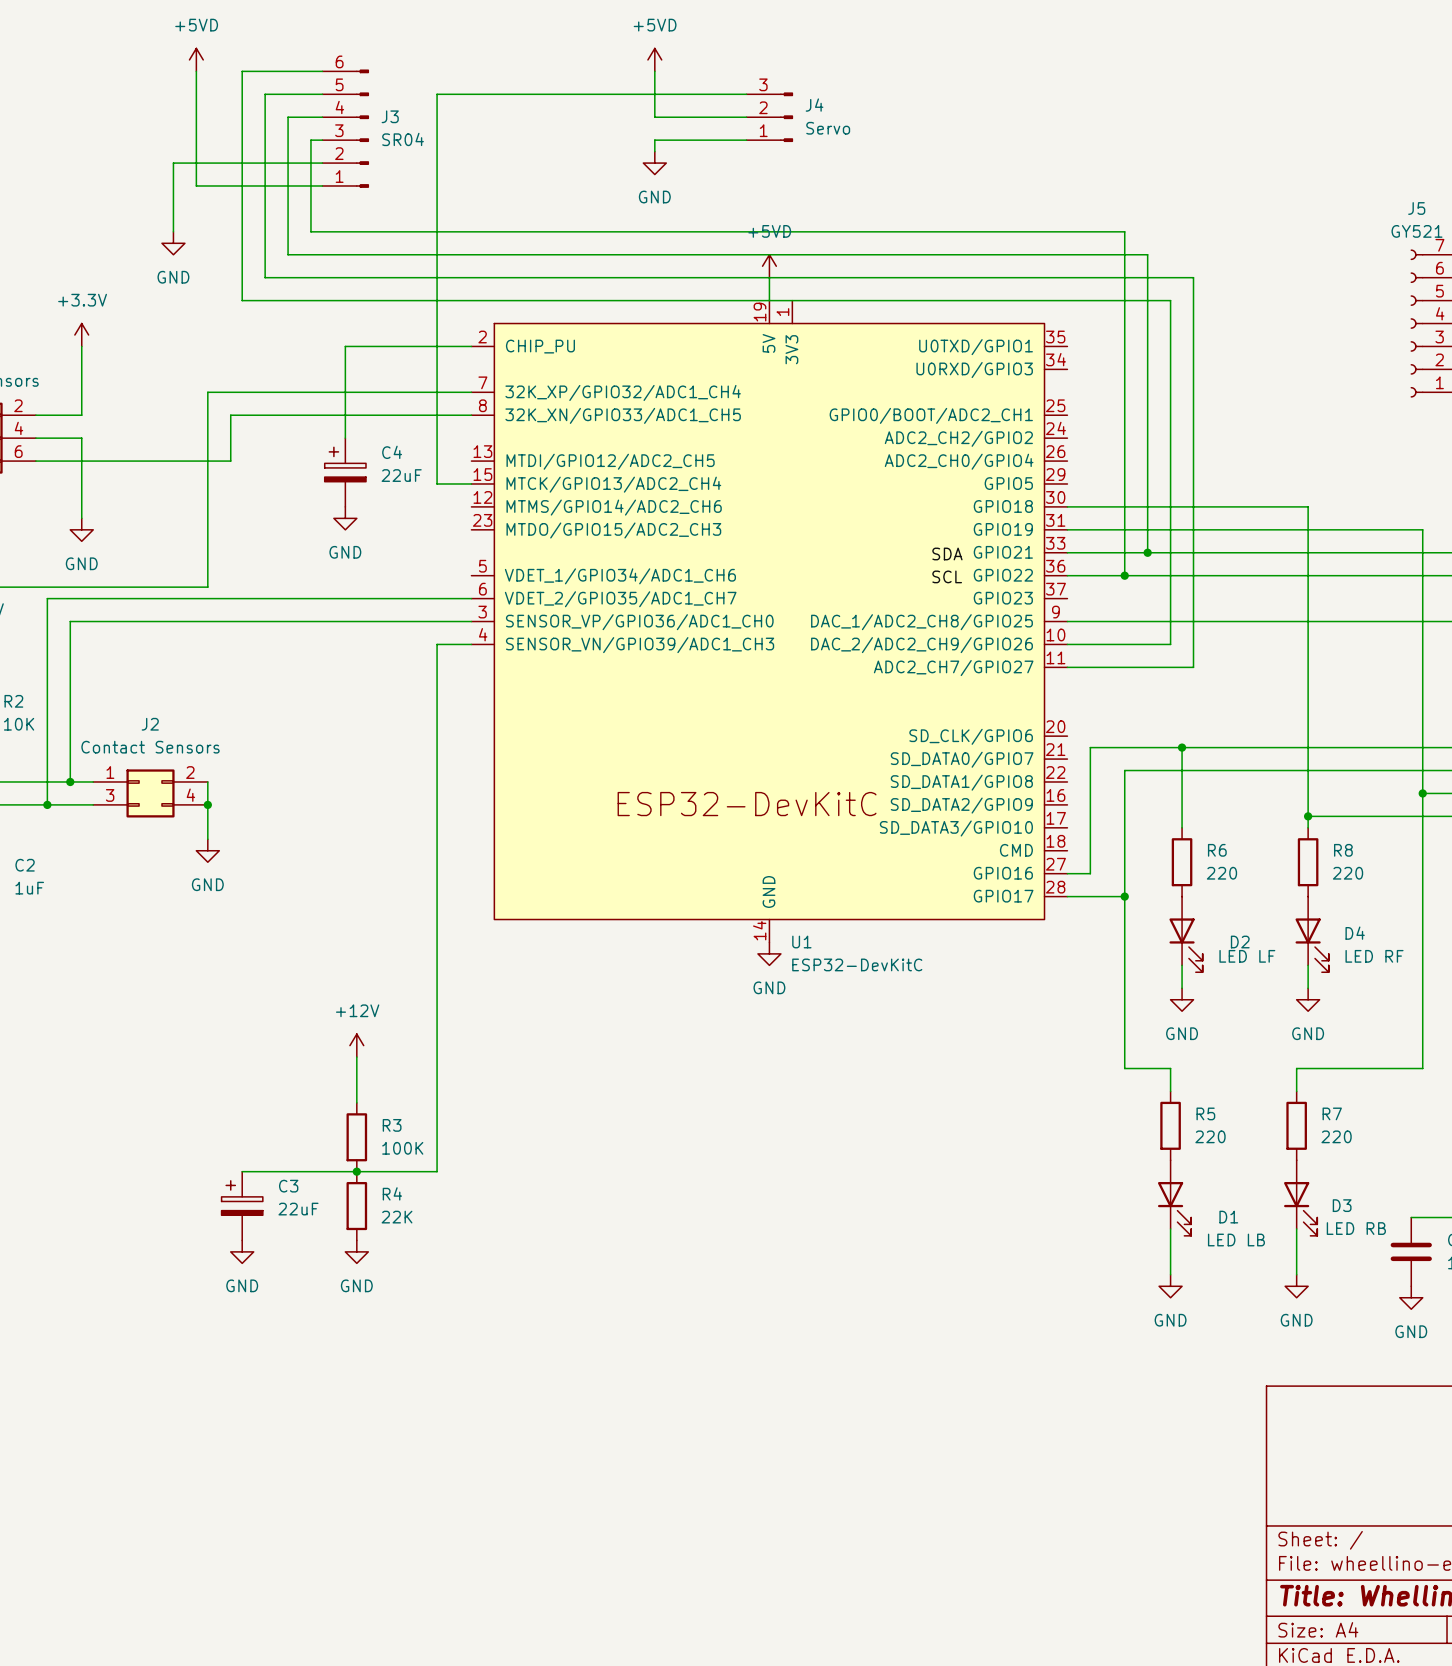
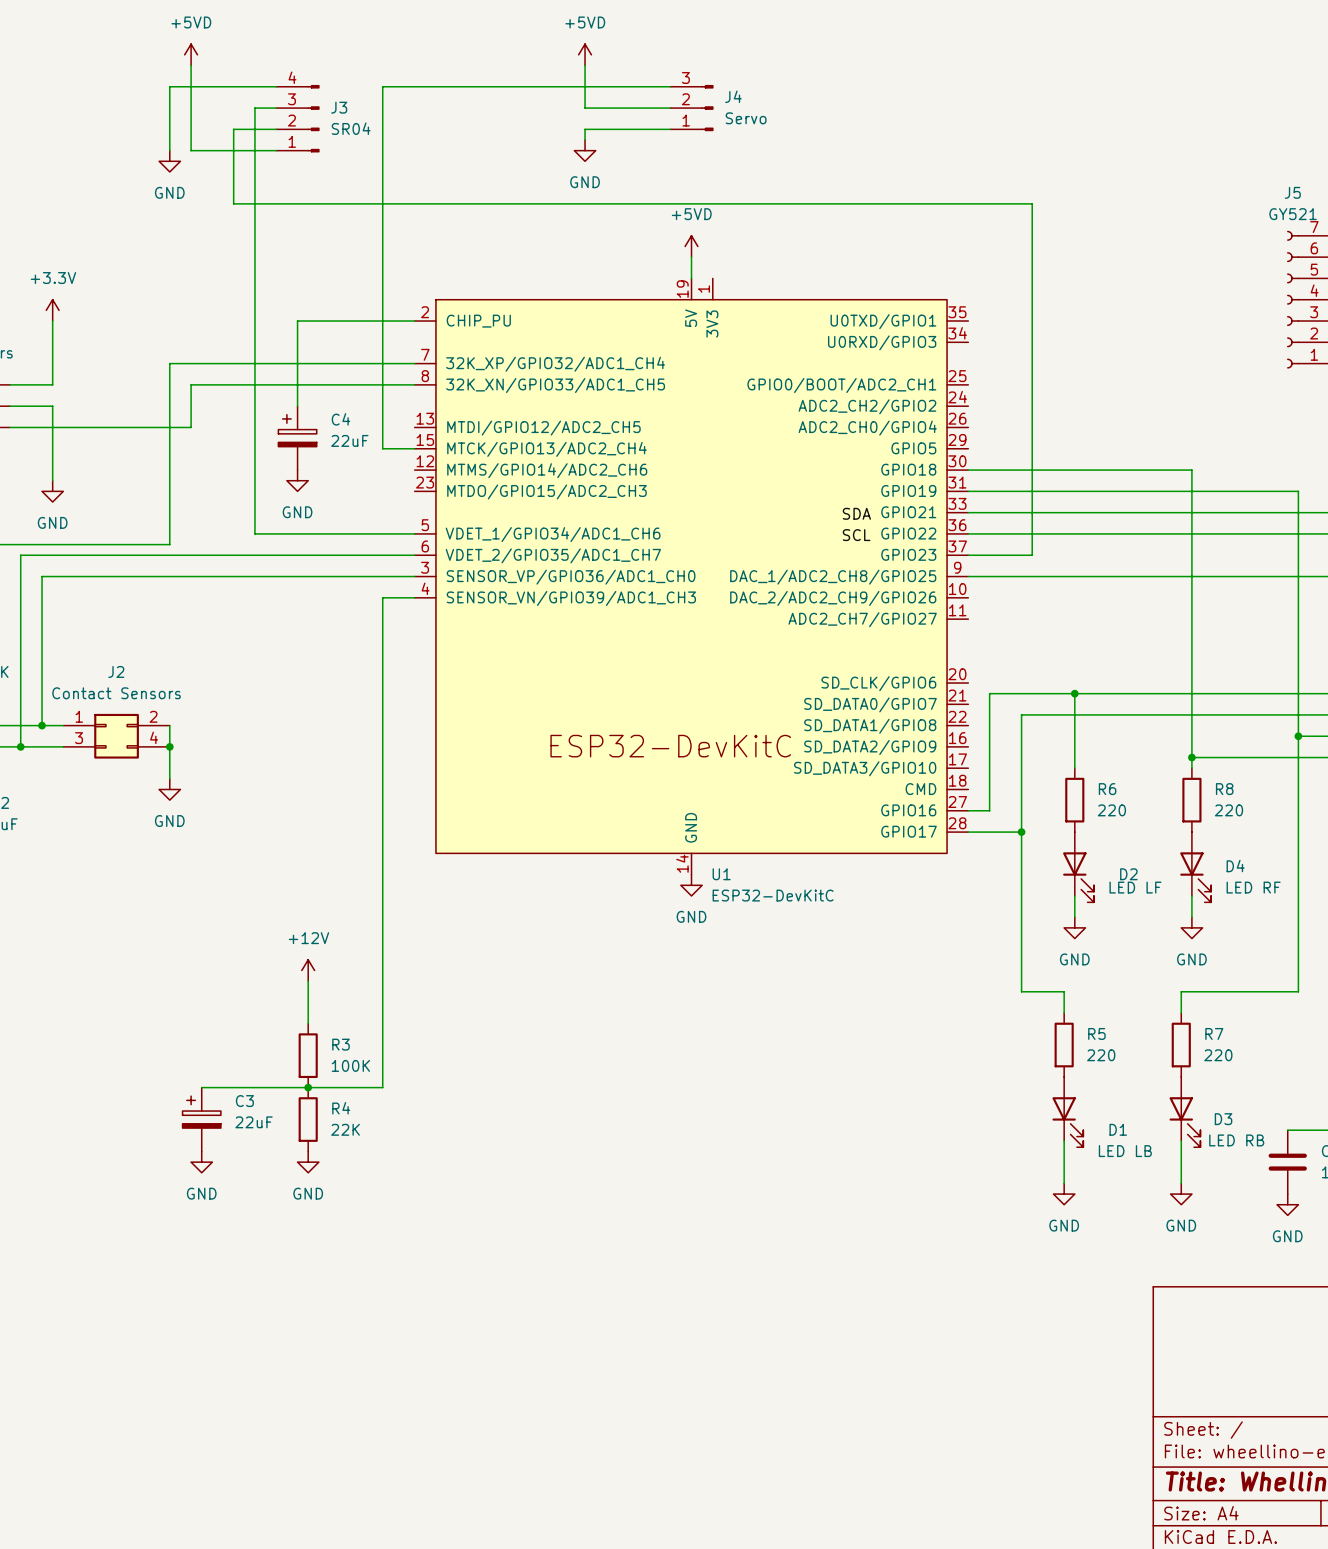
power symbol position: +5VD (196, 59) -> +5VD (191, 54)
J3 symbol: [322, 69, 369, 188] -> [276, 85, 320, 153]
wire: (196, 71) (196, 185) (322, 185) -> none
wire: (322, 71) (242, 71) (242, 300) (1170, 300) (1170, 644) (1067, 644) -> none
wire: (265, 94) (265, 277) (1193, 277) (1193, 667) (1067, 667) -> (223, 86) (169, 86) (169, 150)
wire: (299, 117) (288, 117) (288, 254) (1147, 254) (1147, 552) -> (254, 108) (254, 533) (414, 533)
wire: (310, 140) (310, 231) (1124, 231) (1124, 575) -> (265, 129) (233, 129) (233, 203) (1032, 203) (1032, 555) (968, 555)
wire: (230, 163) (173, 163) (173, 231) -> (191, 150) (191, 65)
power symbol position: GND (173, 243) -> GND (169, 161)
junction: (1147, 552) -> none
junction: (1124, 575) -> none

